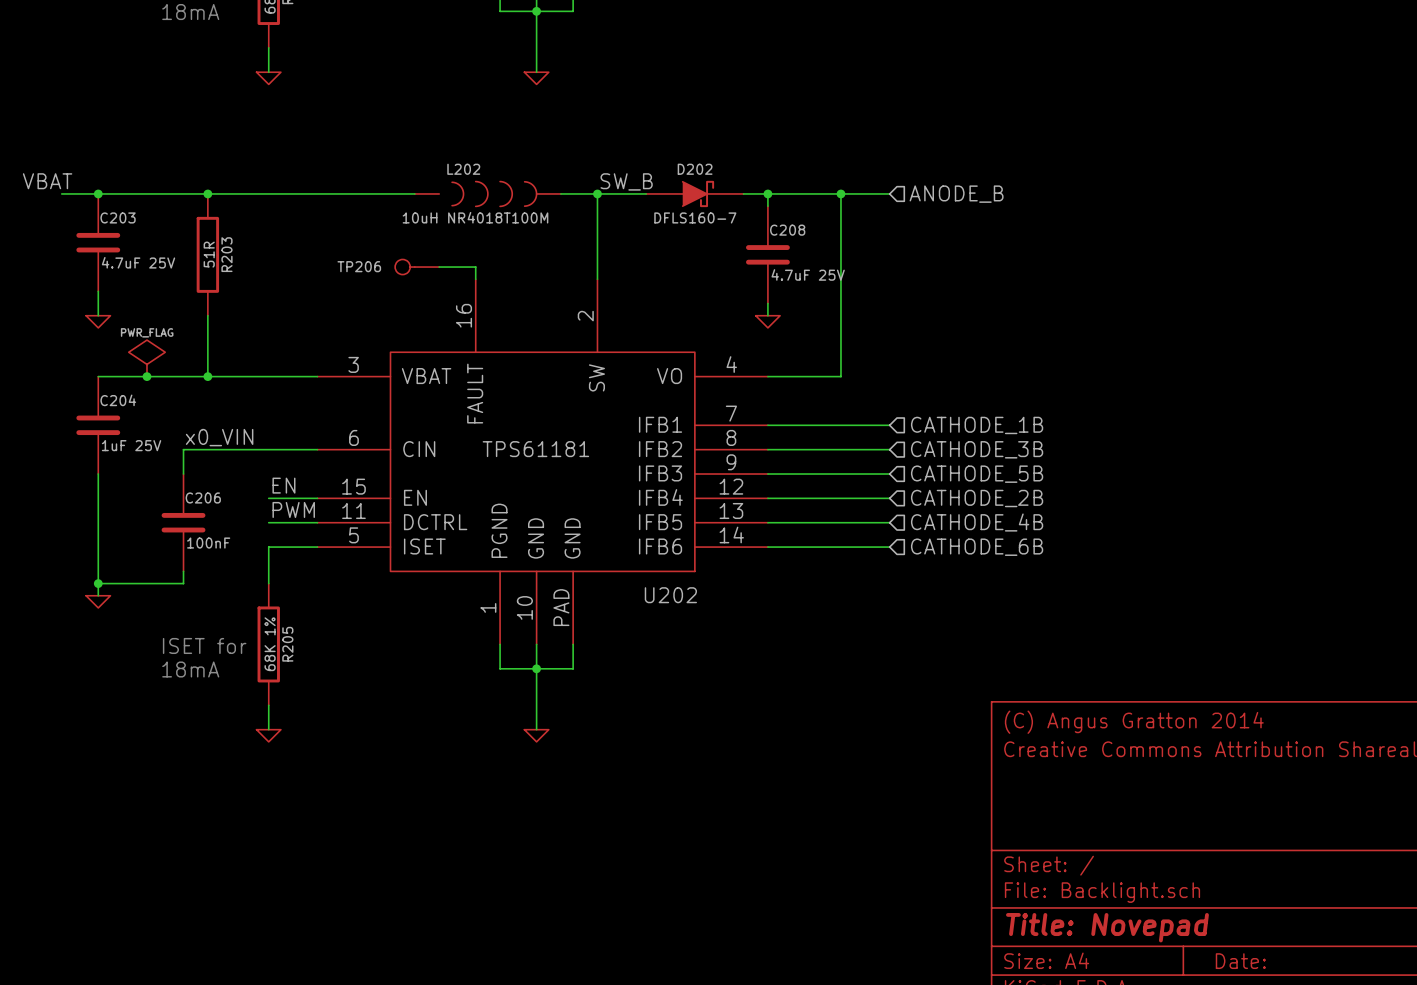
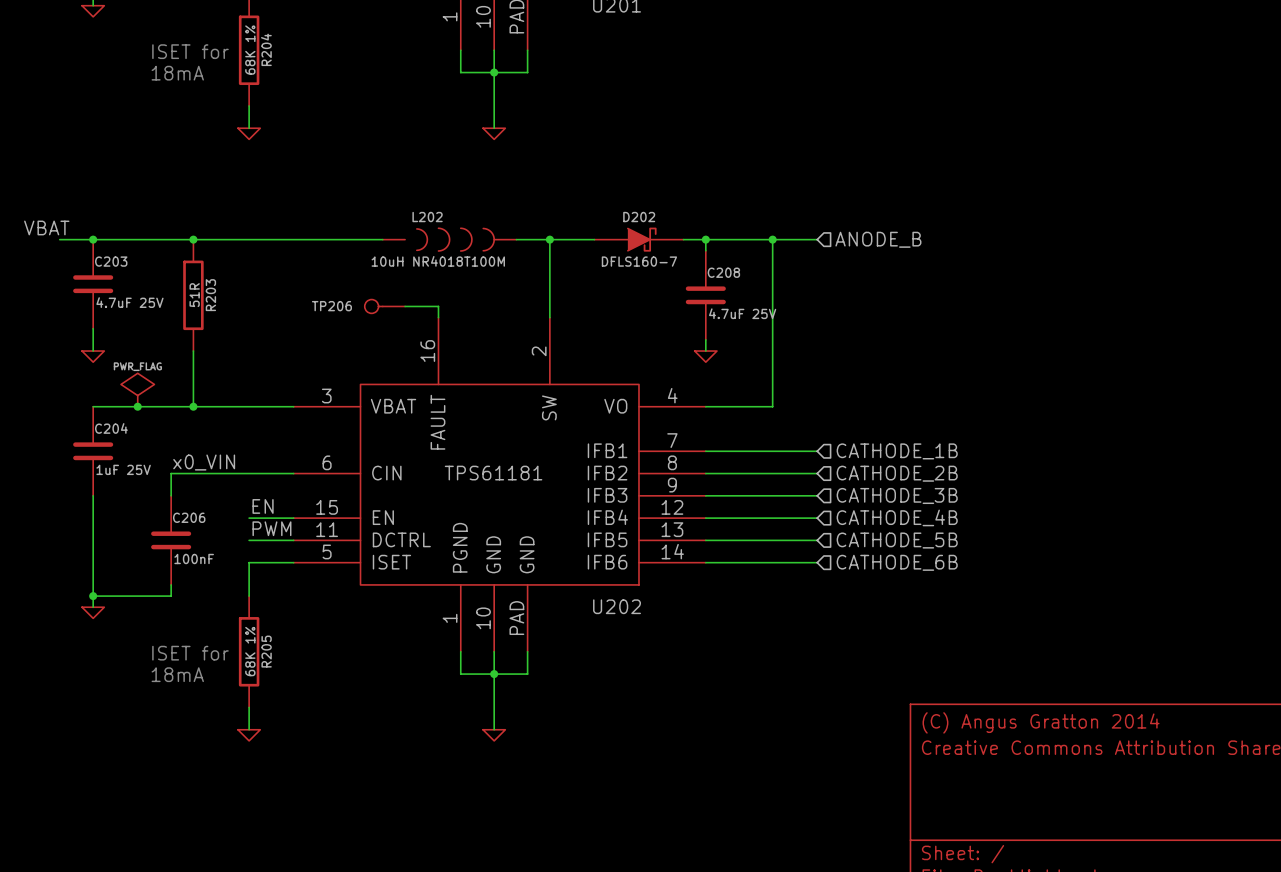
label: SW_B (626, 181) -> none
hierarchical label: CATHODE_3B (977, 449) -> CATHODE_2B (897, 473)
hierarchical label: CATHODE_5B (977, 474) -> CATHODE_3B (897, 495)
hierarchical label: CATHODE_2B (977, 498) -> CATHODE_4B (897, 517)
hierarchical label: CATHODE_4B (977, 522) -> CATHODE_5B (897, 540)

